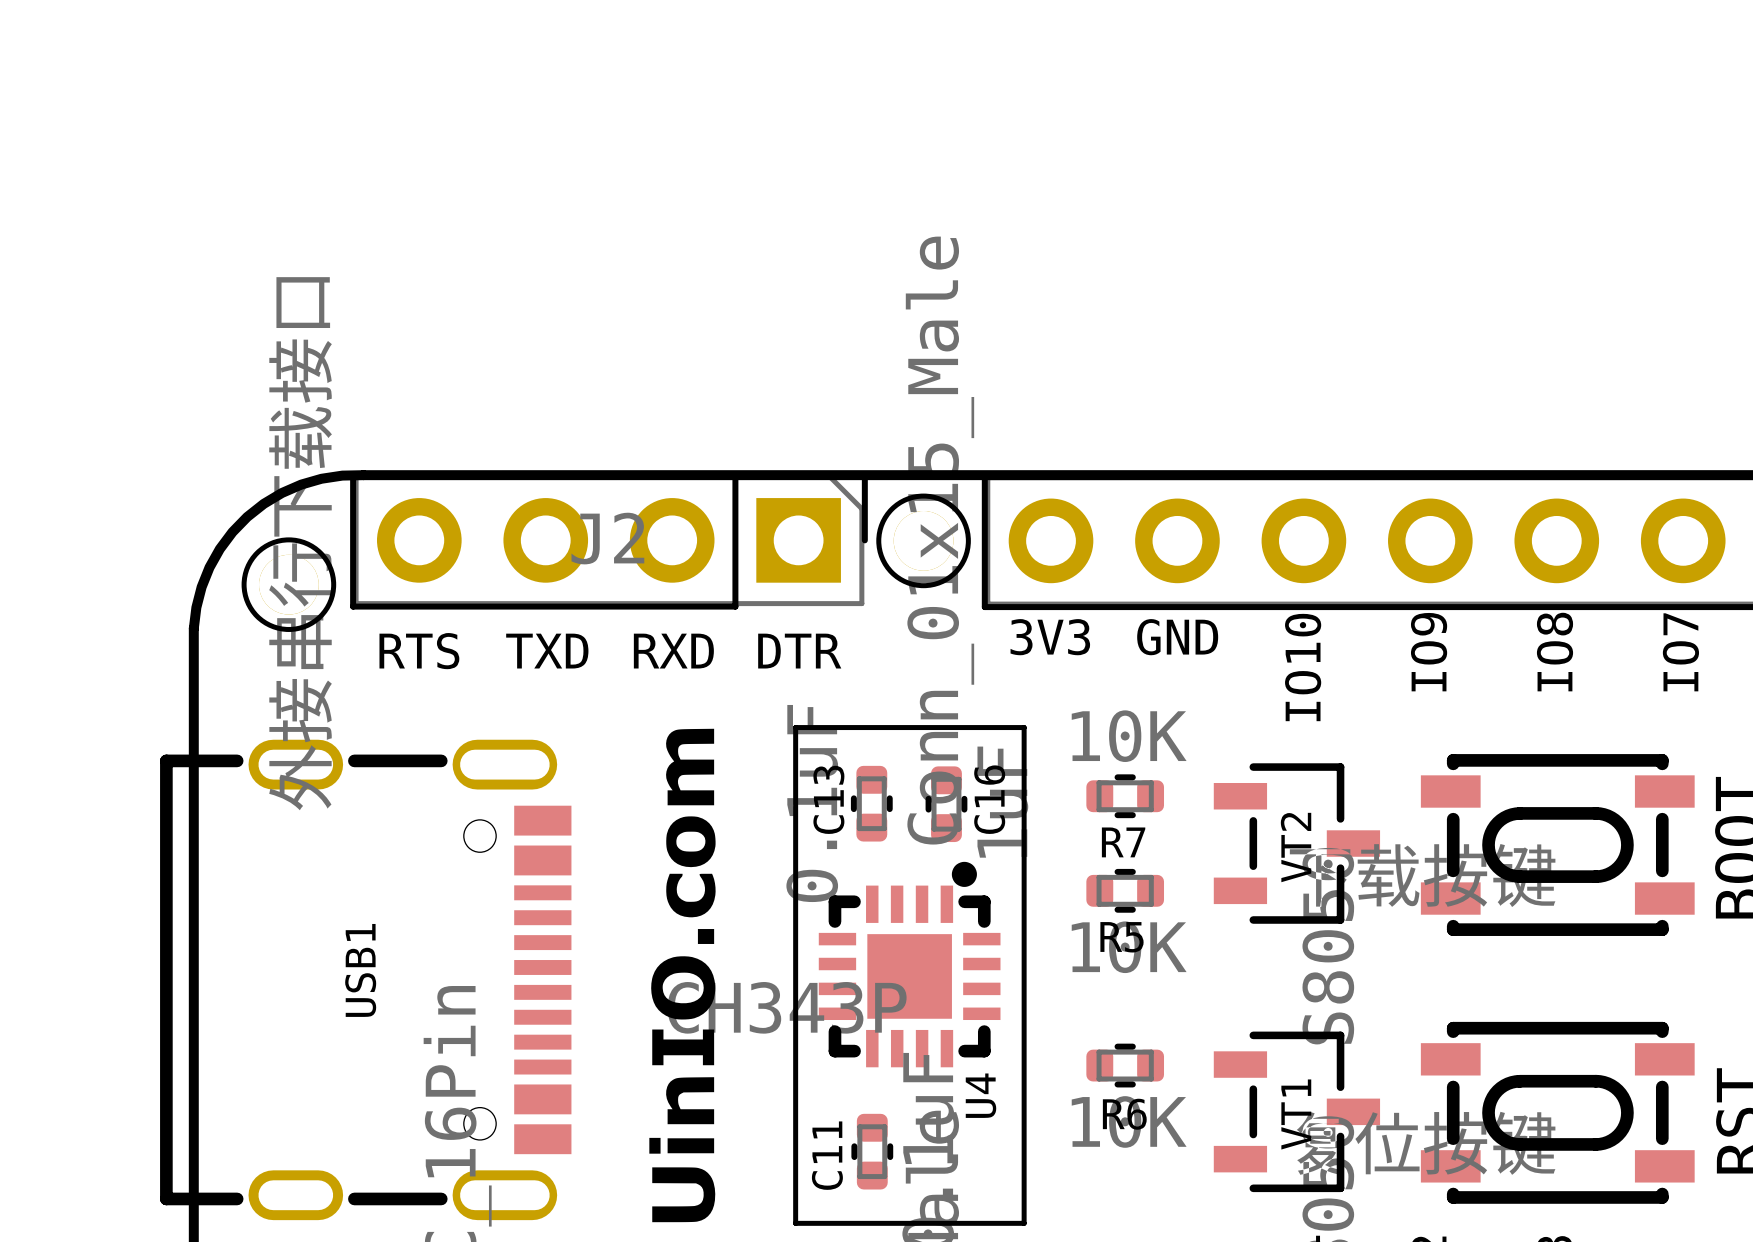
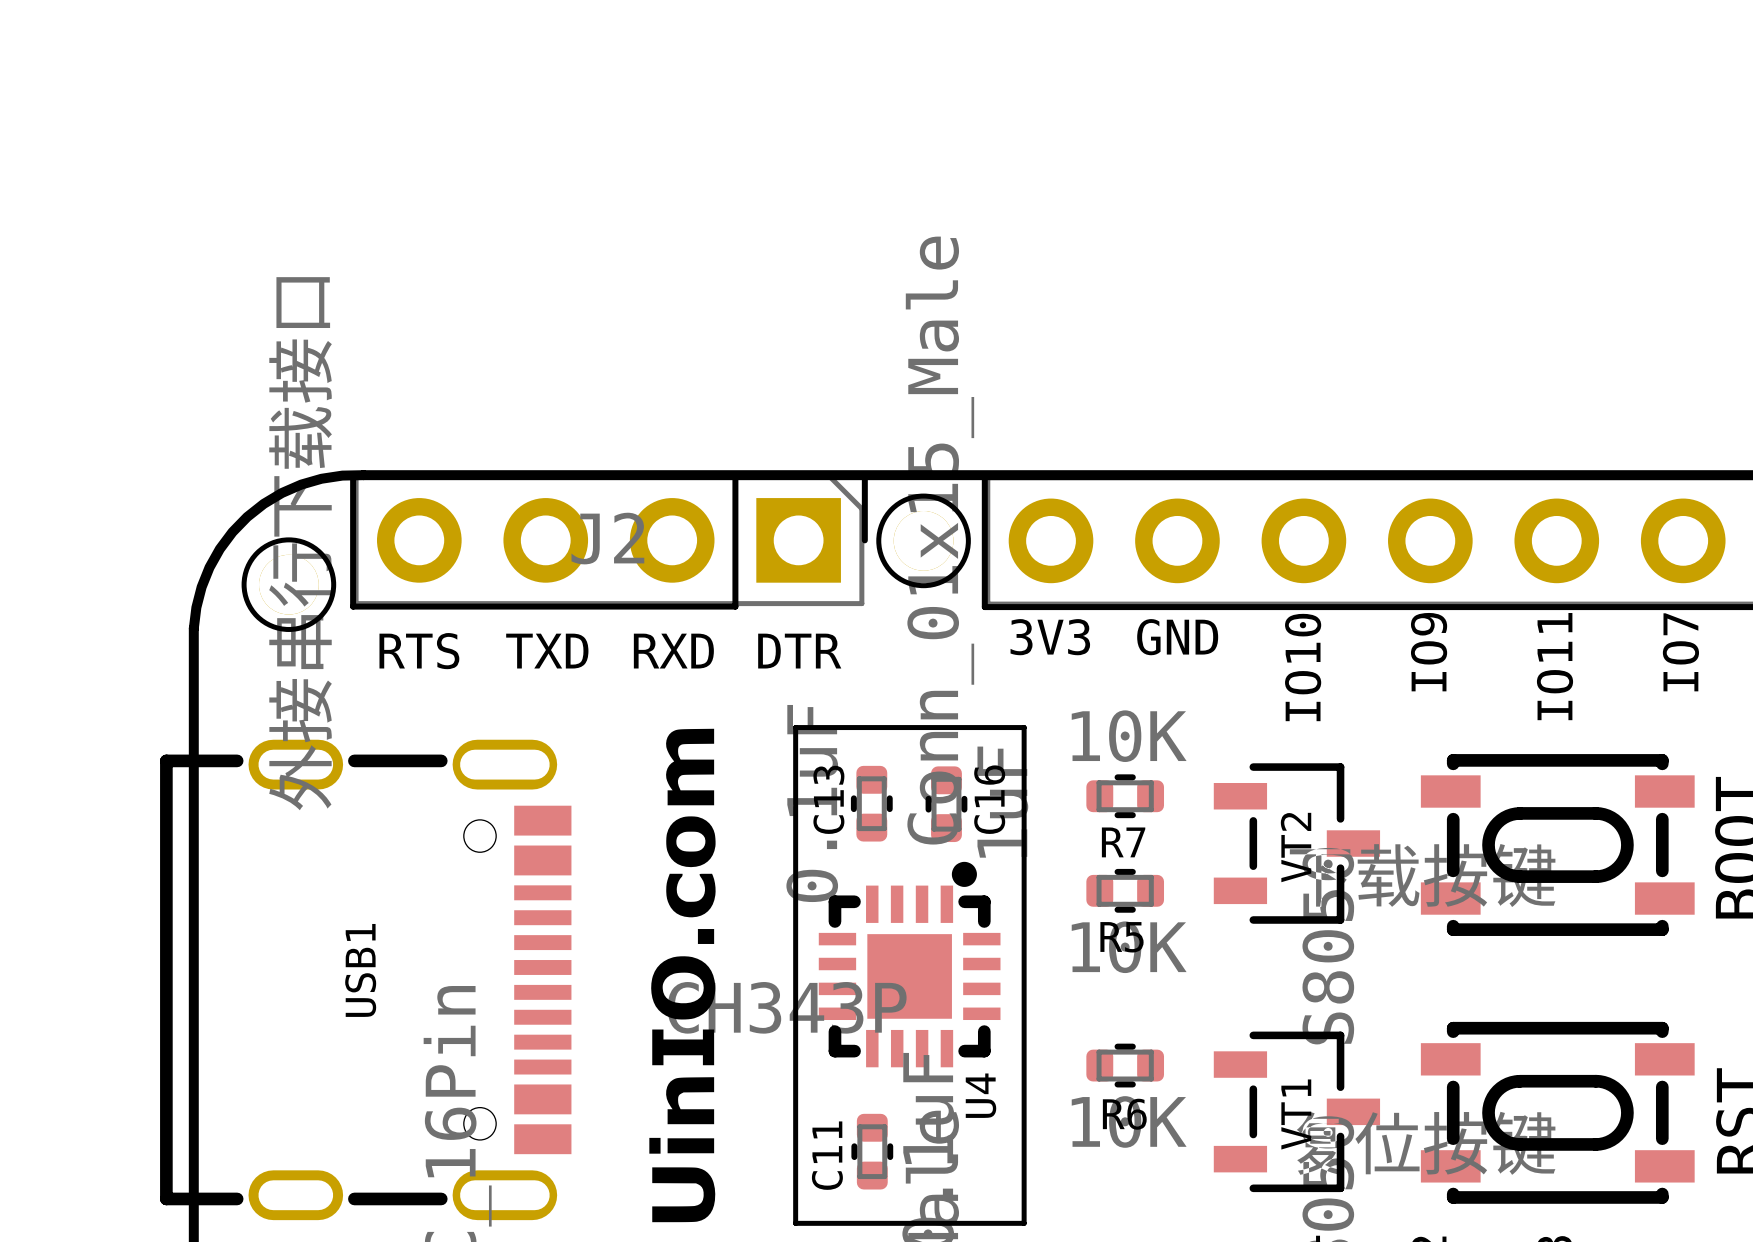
text: IO8 (1555, 652) -> IO11 (1555, 666)

